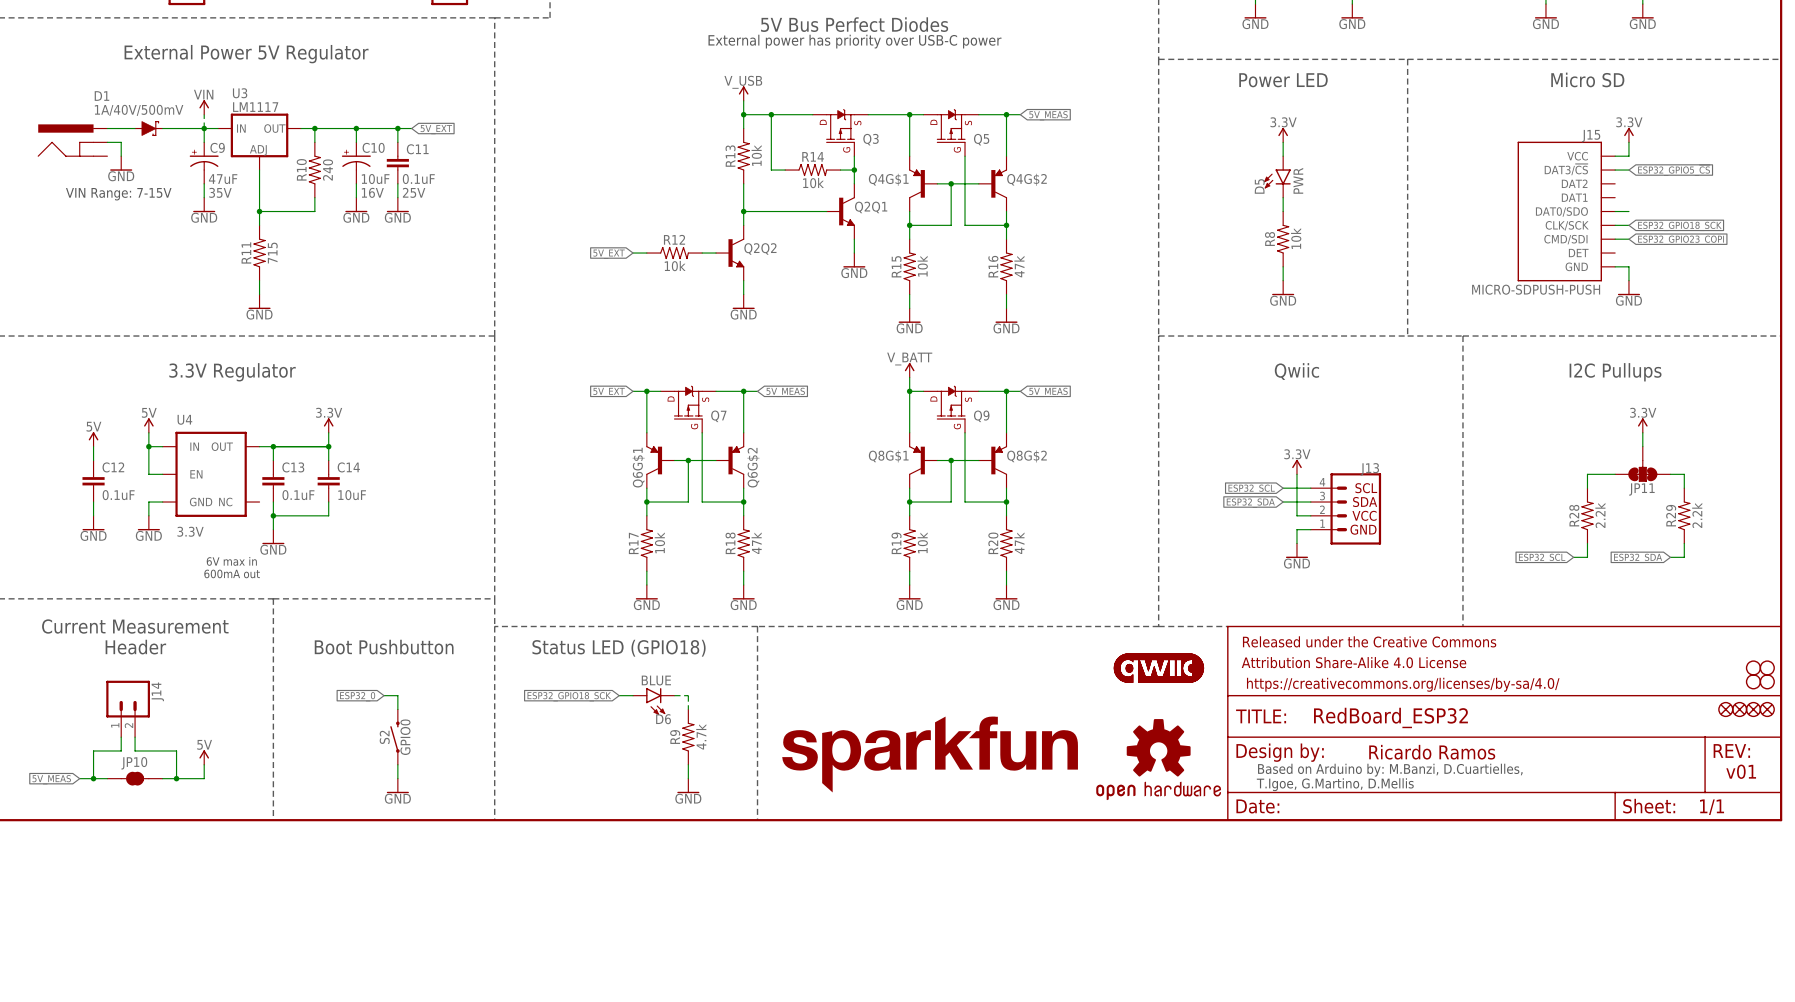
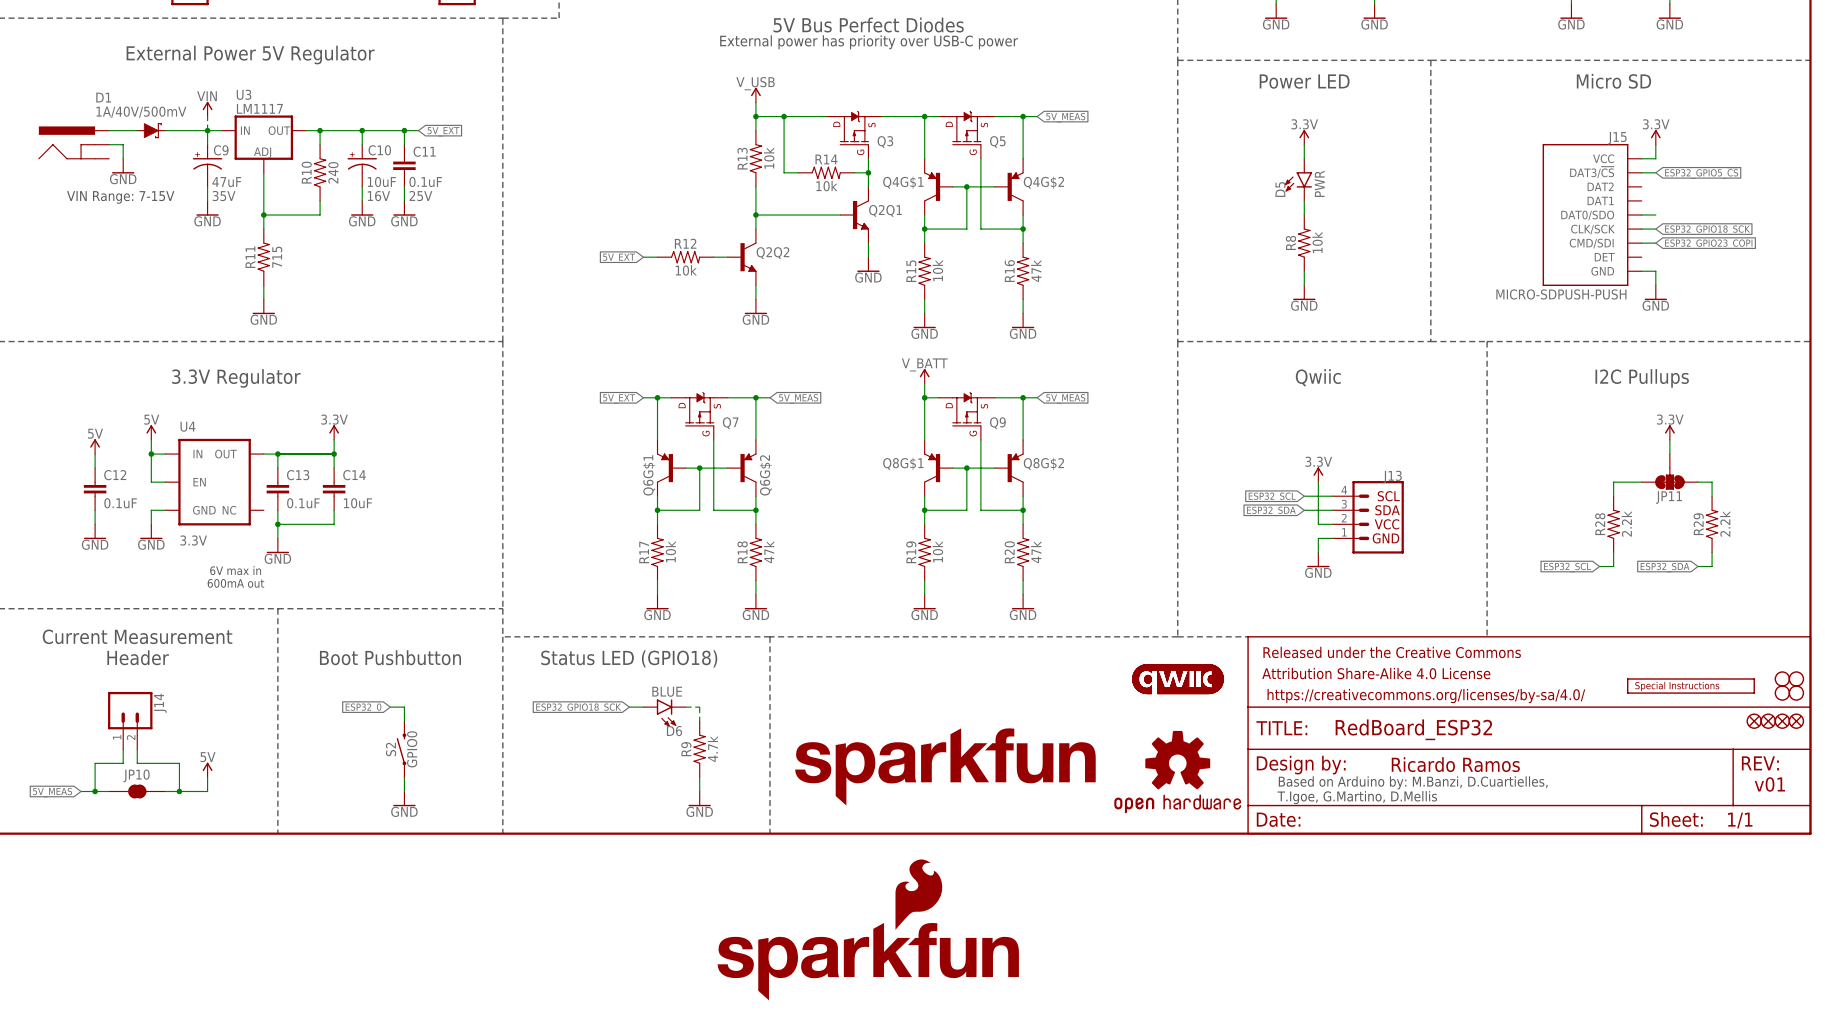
part: none -> (1690, 686)
part: none -> (868, 929)

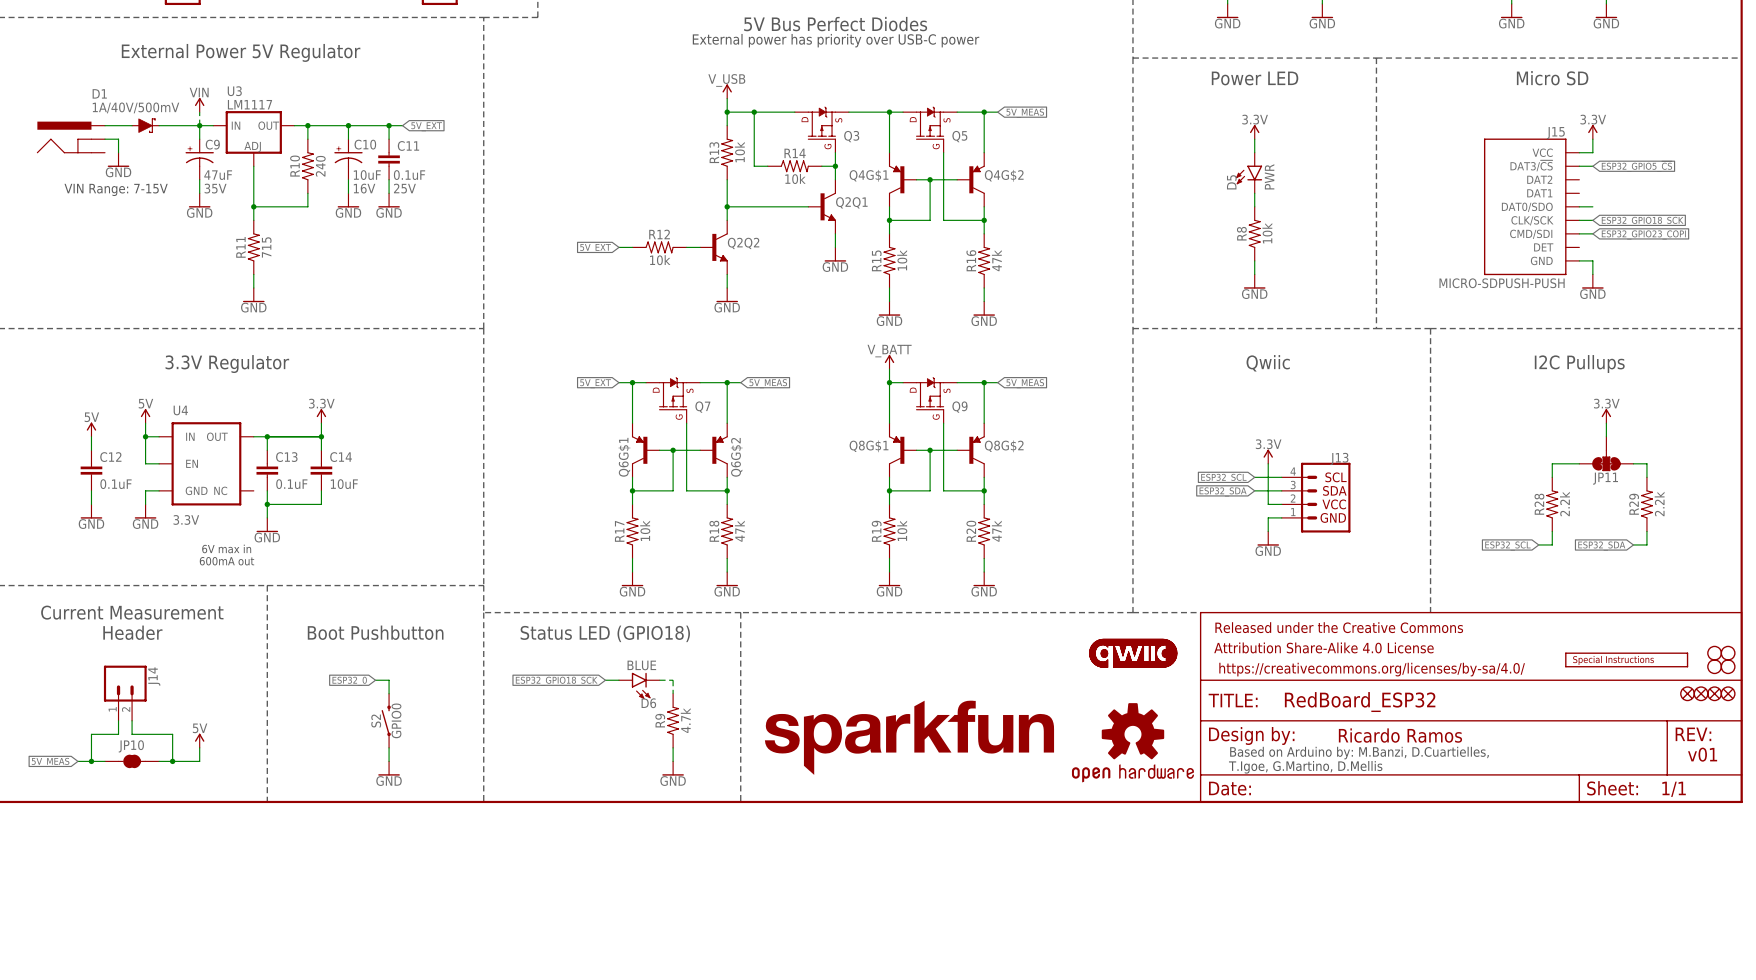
part: (868, 929) -> none

